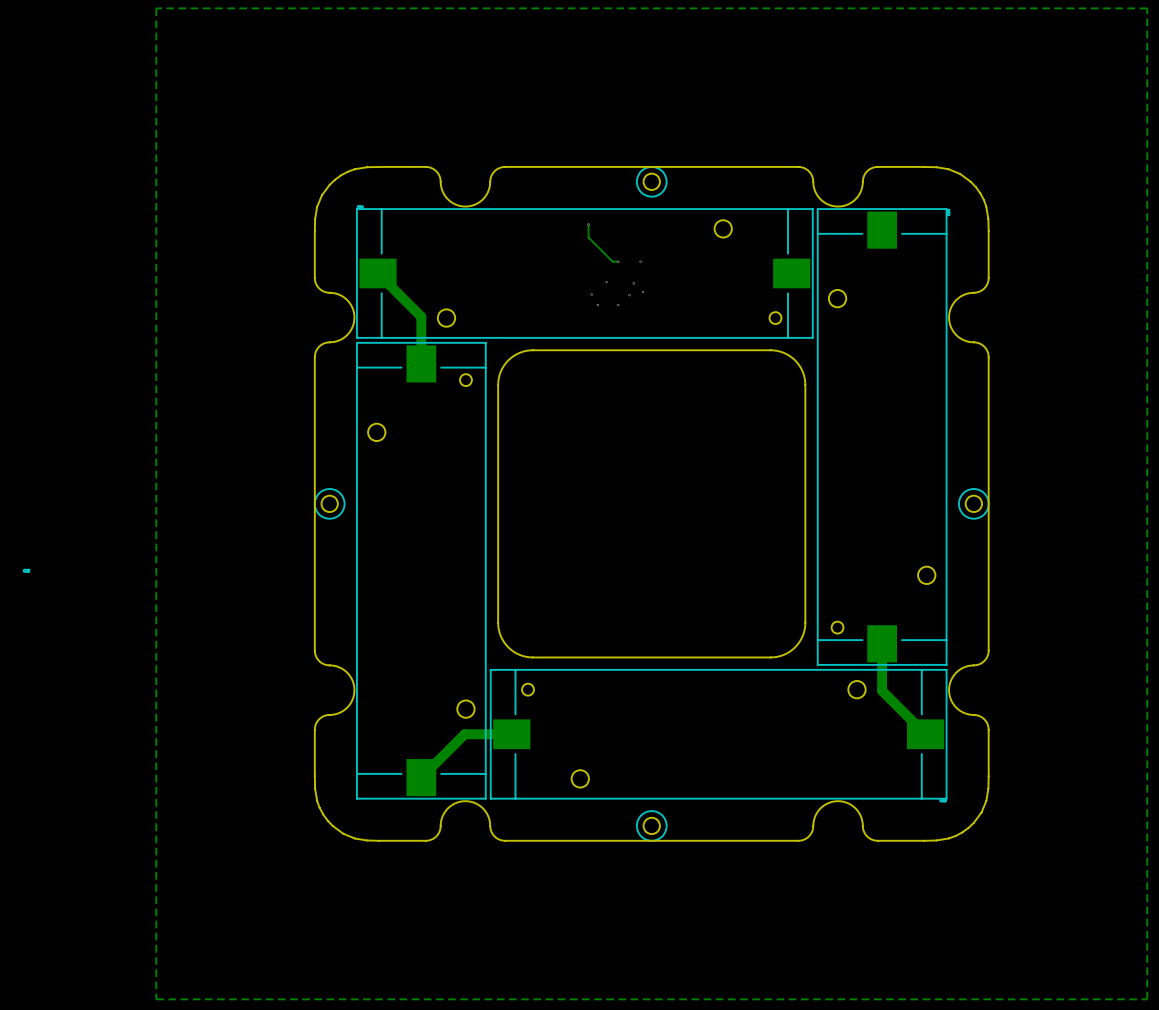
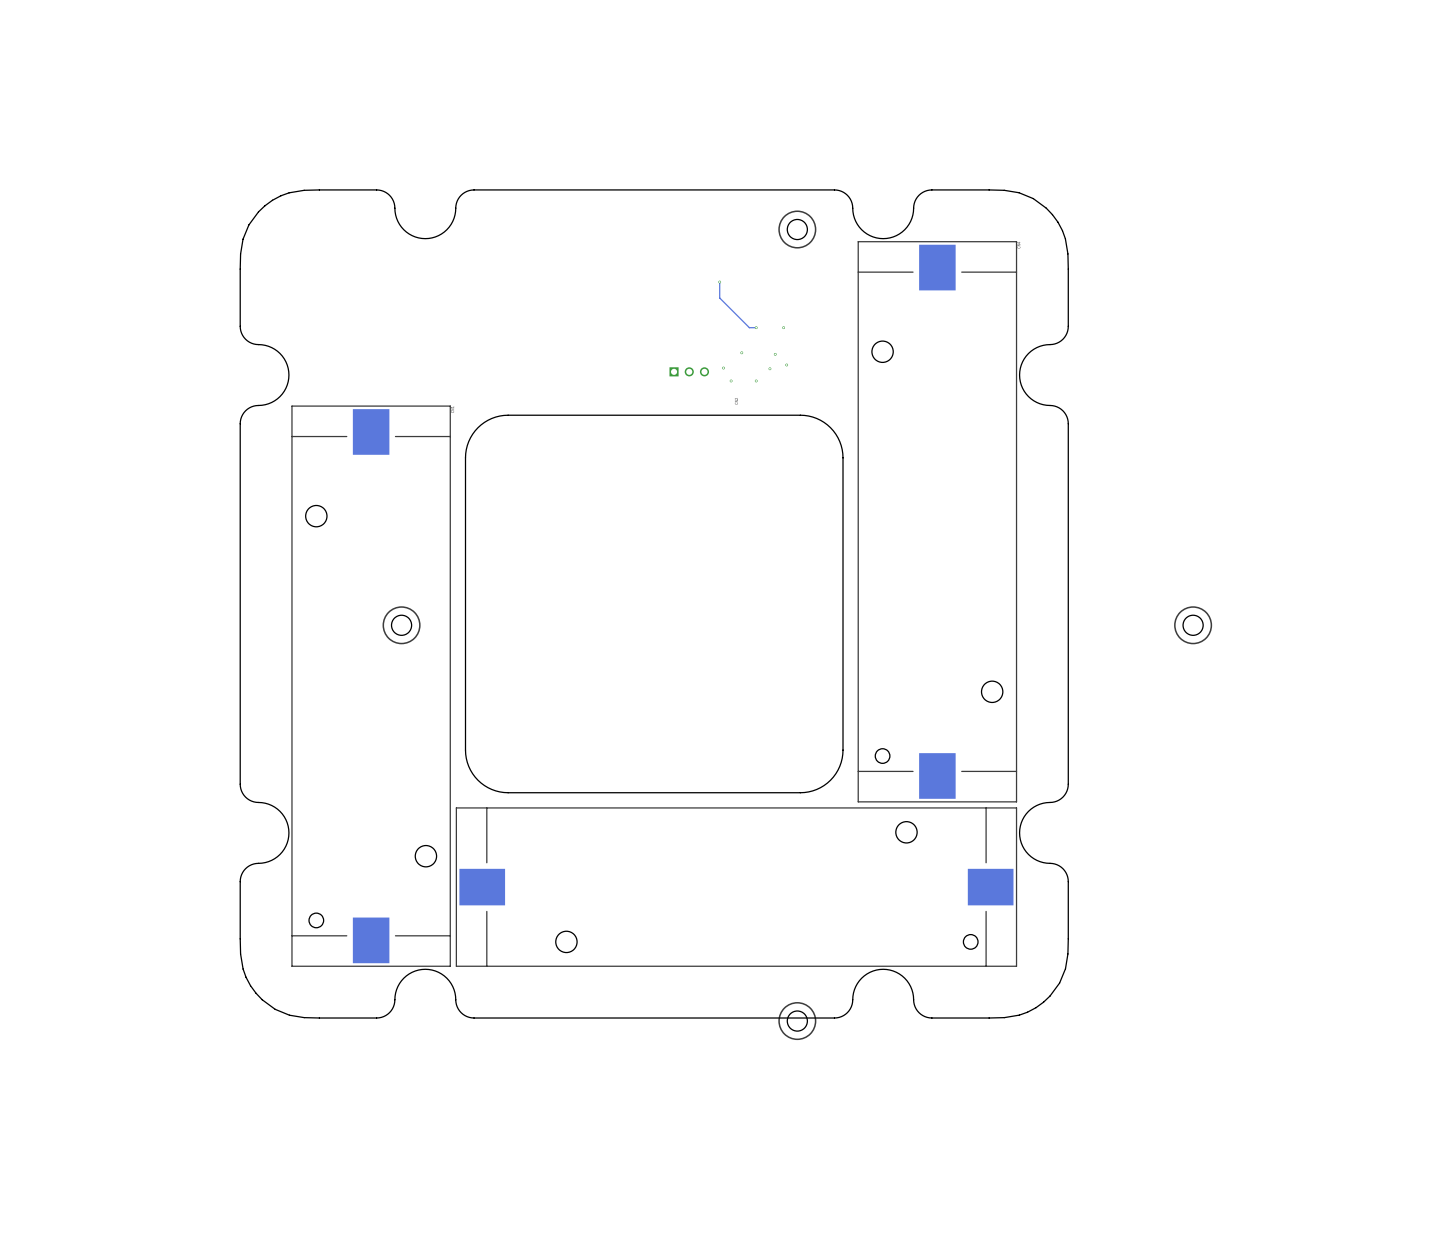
zone outline: (1147, 8) (156, 8) (156, 999) (1147, 999) (1147, 8) -> none
board edge: (924, 166) (872, 168) (864, 174) (861, 189) (857, 197) (848, 204) (838, 206) (829, 205) (820, 199) (814, 189) (810, 172) (805, 168) (798, 166) (503, 167) (496, 170) (492, 174) (488, 189) (482, 199) (473, 205) (465, 206) (457, 205) (447, 199) (442, 189) (438, 174) (434, 170) (427, 167) (366, 167) (354, 169) (341, 175) (329, 184) (321, 195) (315, 219) (314, 279) (317, 286) (322, 290) (337, 294) (347, 300) (353, 309) (354, 317) (353, 325) (347, 335) (337, 340) (320, 345) (316, 349) (314, 357) (314, 652) (317, 659) (322, 663) (337, 666) (347, 672) (353, 681) (354, 690) (353, 698) (347, 707) (337, 713) (322, 716) (317, 720) (314, 727) (315, 788) (317, 800) (323, 814) (332, 825) (343, 833) (366, 840) (427, 840) (434, 837) (438, 833) (442, 817) (447, 808) (457, 802) (465, 801) (473, 802) (482, 808) (488, 817) (493, 834) (497, 838) (505, 840) (800, 840) (807, 837) (811, 833) (814, 817) (820, 808) (829, 802) (838, 801) (846, 802) (855, 808) (861, 817) (864, 833) (868, 837) (875, 840) (936, 840) (948, 838) (962, 832) (973, 822) (981, 812) (988, 788) (988, 727) (985, 720) (981, 716) (965, 713) (956, 707) (950, 698) (949, 690) (950, 681) (956, 672) (965, 666) (981, 663) (985, 659) (988, 652) (988, 357) (986, 349) (982, 345) (965, 340) (956, 335) (950, 325) (949, 317) (951, 306) (958, 298) (965, 294) (981, 290) (987, 283) (988, 218) (983, 200) (970, 181) (960, 174) (948, 169) (924, 166) -> (989, 189) (924, 191) (916, 199) (911, 218) (906, 227) (896, 235) (883, 238) (873, 236) (861, 229) (854, 218) (848, 197) (843, 192) (834, 189) (471, 190) (462, 193) (458, 199) (454, 218) (446, 229) (435, 236) (425, 238) (415, 236) (403, 229) (396, 218) (392, 199) (387, 193) (378, 190) (304, 190) (289, 192) (272, 200) (258, 211) (248, 224) (243, 239) (240, 253) (240, 328) (243, 337) (249, 342) (268, 346) (280, 353) (287, 364) (288, 375) (287, 385) (280, 396) (268, 403) (247, 409) (242, 414) (240, 423) (240, 786) (243, 795) (249, 800) (268, 804) (280, 811) (287, 822) (288, 832) (287, 842) (280, 854) (268, 861) (249, 865) (243, 870) (240, 879) (240, 954) (243, 969) (250, 985) (262, 999) (275, 1009) (289, 1015) (304, 1017) (378, 1017) (387, 1014) (392, 1008) (396, 989) (403, 978) (415, 971) (425, 969) (435, 971) (446, 978) (454, 989) (459, 1010) (464, 1015) (474, 1018) (836, 1017) (845, 1014) (850, 1008) (854, 989) (861, 978) (873, 971) (883, 969) (893, 971) (904, 978) (911, 989) (916, 1008) (920, 1014) (929, 1017) (1004, 1017) (1019, 1015) (1036, 1007) (1050, 996) (1059, 983) (1065, 968) (1067, 953) (1068, 879) (1064, 870) (1059, 865) (1039, 861) (1028, 854) (1021, 842) (1019, 832) (1021, 822) (1028, 811) (1039, 804) (1059, 800) (1064, 795) (1068, 786) (1068, 423) (1065, 414) (1061, 409) (1039, 403) (1028, 396) (1021, 385) (1019, 375) (1022, 361) (1031, 351) (1039, 346) (1059, 342) (1066, 333) (1067, 253) (1062, 230) (1046, 208) (1033, 198) (1019, 192) (989, 189)
track: (378, 273) (421, 316) (421, 363) -> none
part rotation: 0° (584, 273) -> 90° clockwise (371, 686)
part position: (584, 273) -> (371, 686)
part: none -> (689, 371)
board edge: (770, 350) (532, 350) (519, 352) (506, 362) (500, 371) (498, 384) (498, 622) (500, 636) (510, 649) (519, 654) (532, 657) (770, 657) (783, 654) (797, 644) (802, 636) (805, 622) (805, 381) (801, 368) (792, 358) (783, 352) (770, 350) -> (800, 415) (508, 415) (491, 418) (475, 430) (468, 441) (465, 457) (465, 750) (468, 766) (481, 783) (491, 789) (508, 792) (800, 792) (816, 789) (833, 777) (839, 766) (843, 750) (842, 453) (837, 437) (827, 424) (816, 418) (800, 415)
part position: (882, 436) -> (937, 521)
part rotation: 0° (421, 570) -> 90° clockwise (736, 887)
track: (882, 643) (882, 690) (925, 734) -> none
track: (511, 734) (464, 734) (421, 777) -> none
part: (718, 734) -> none

